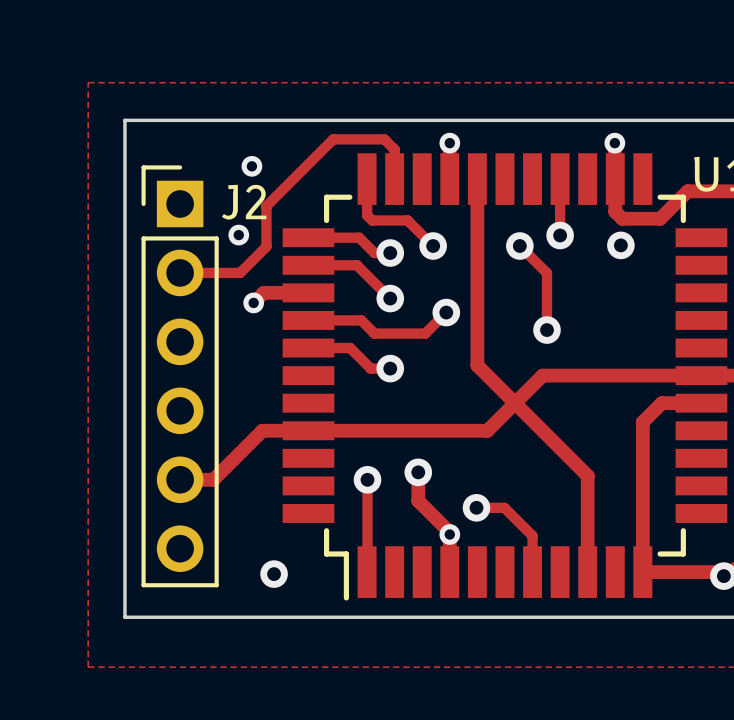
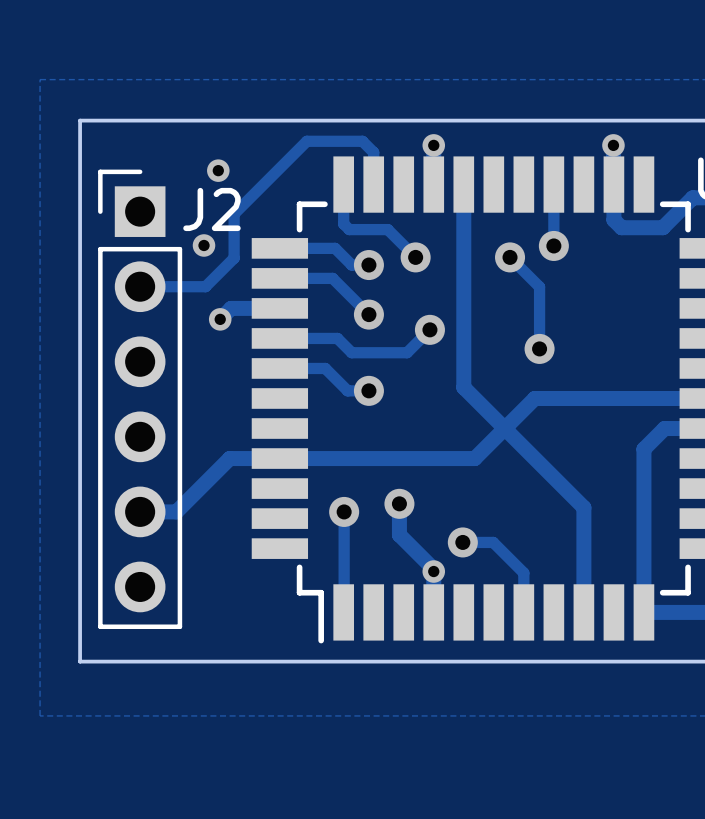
via: (620, 245) -> none
via: (274, 574) -> none

